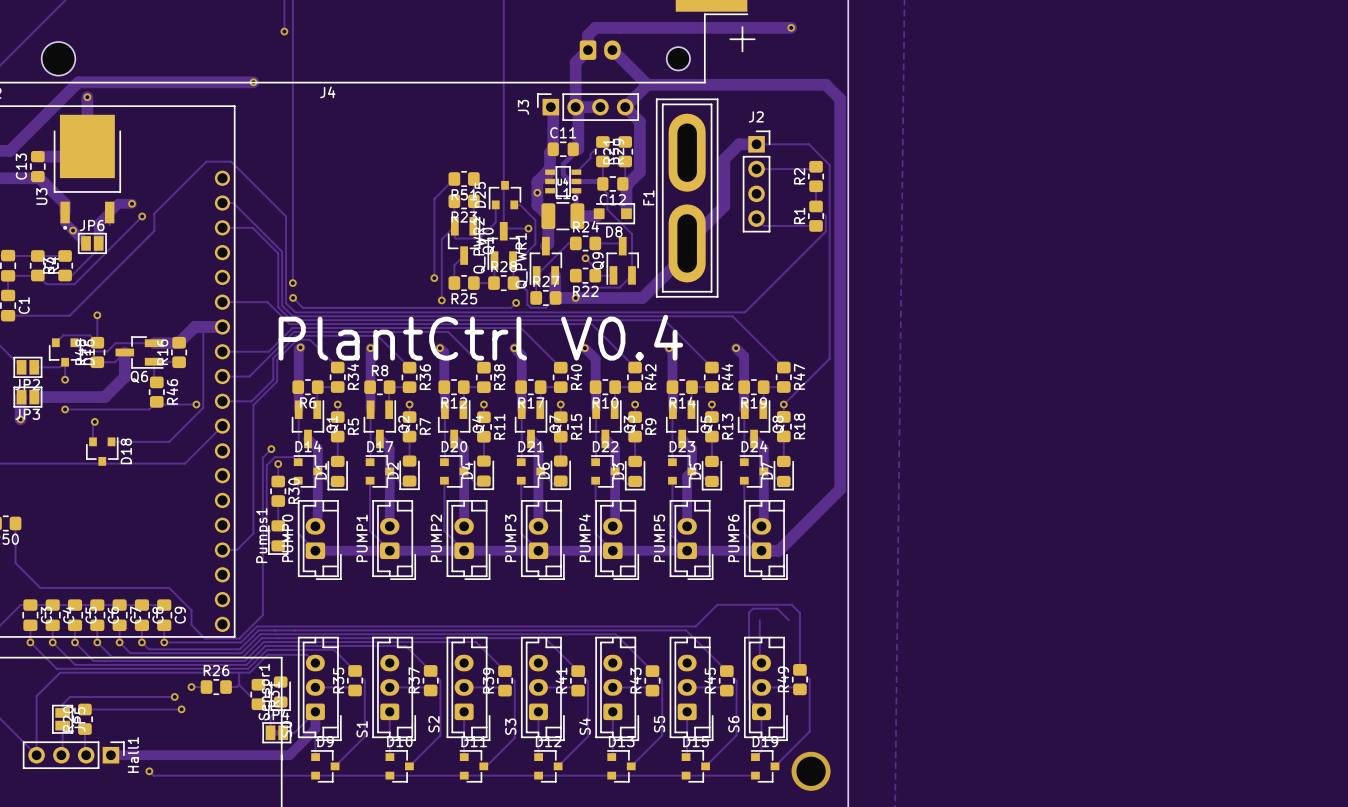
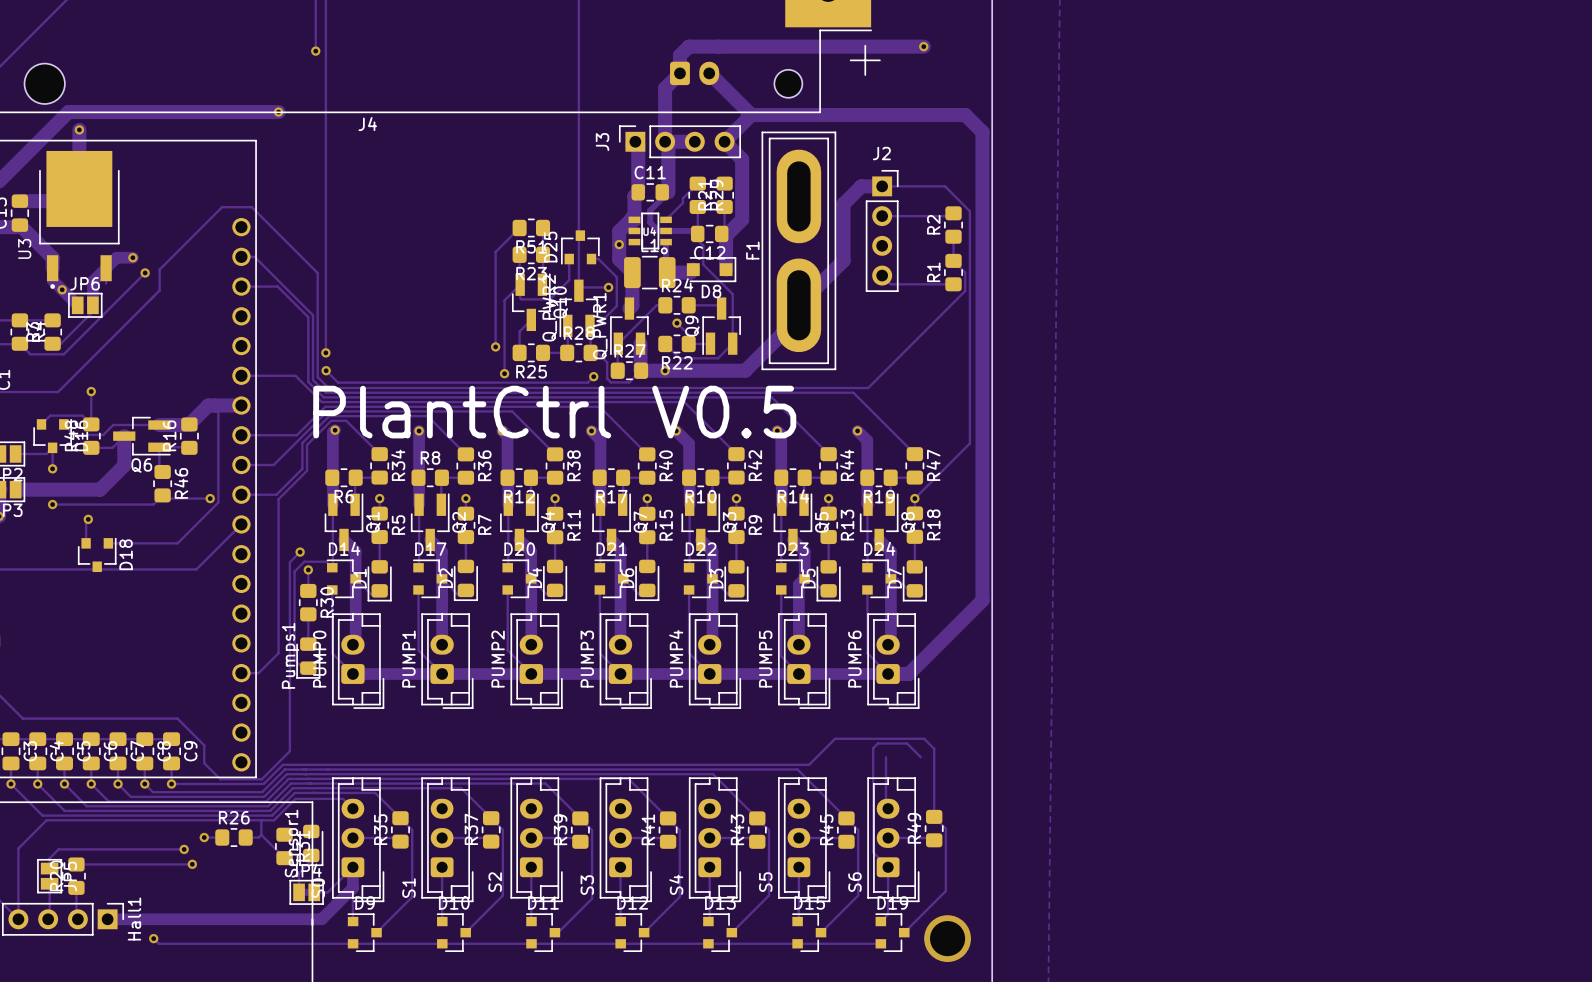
text: PlantCtrl V0.4 (480, 337) -> PlantCtrl V0.5 (554, 412)

